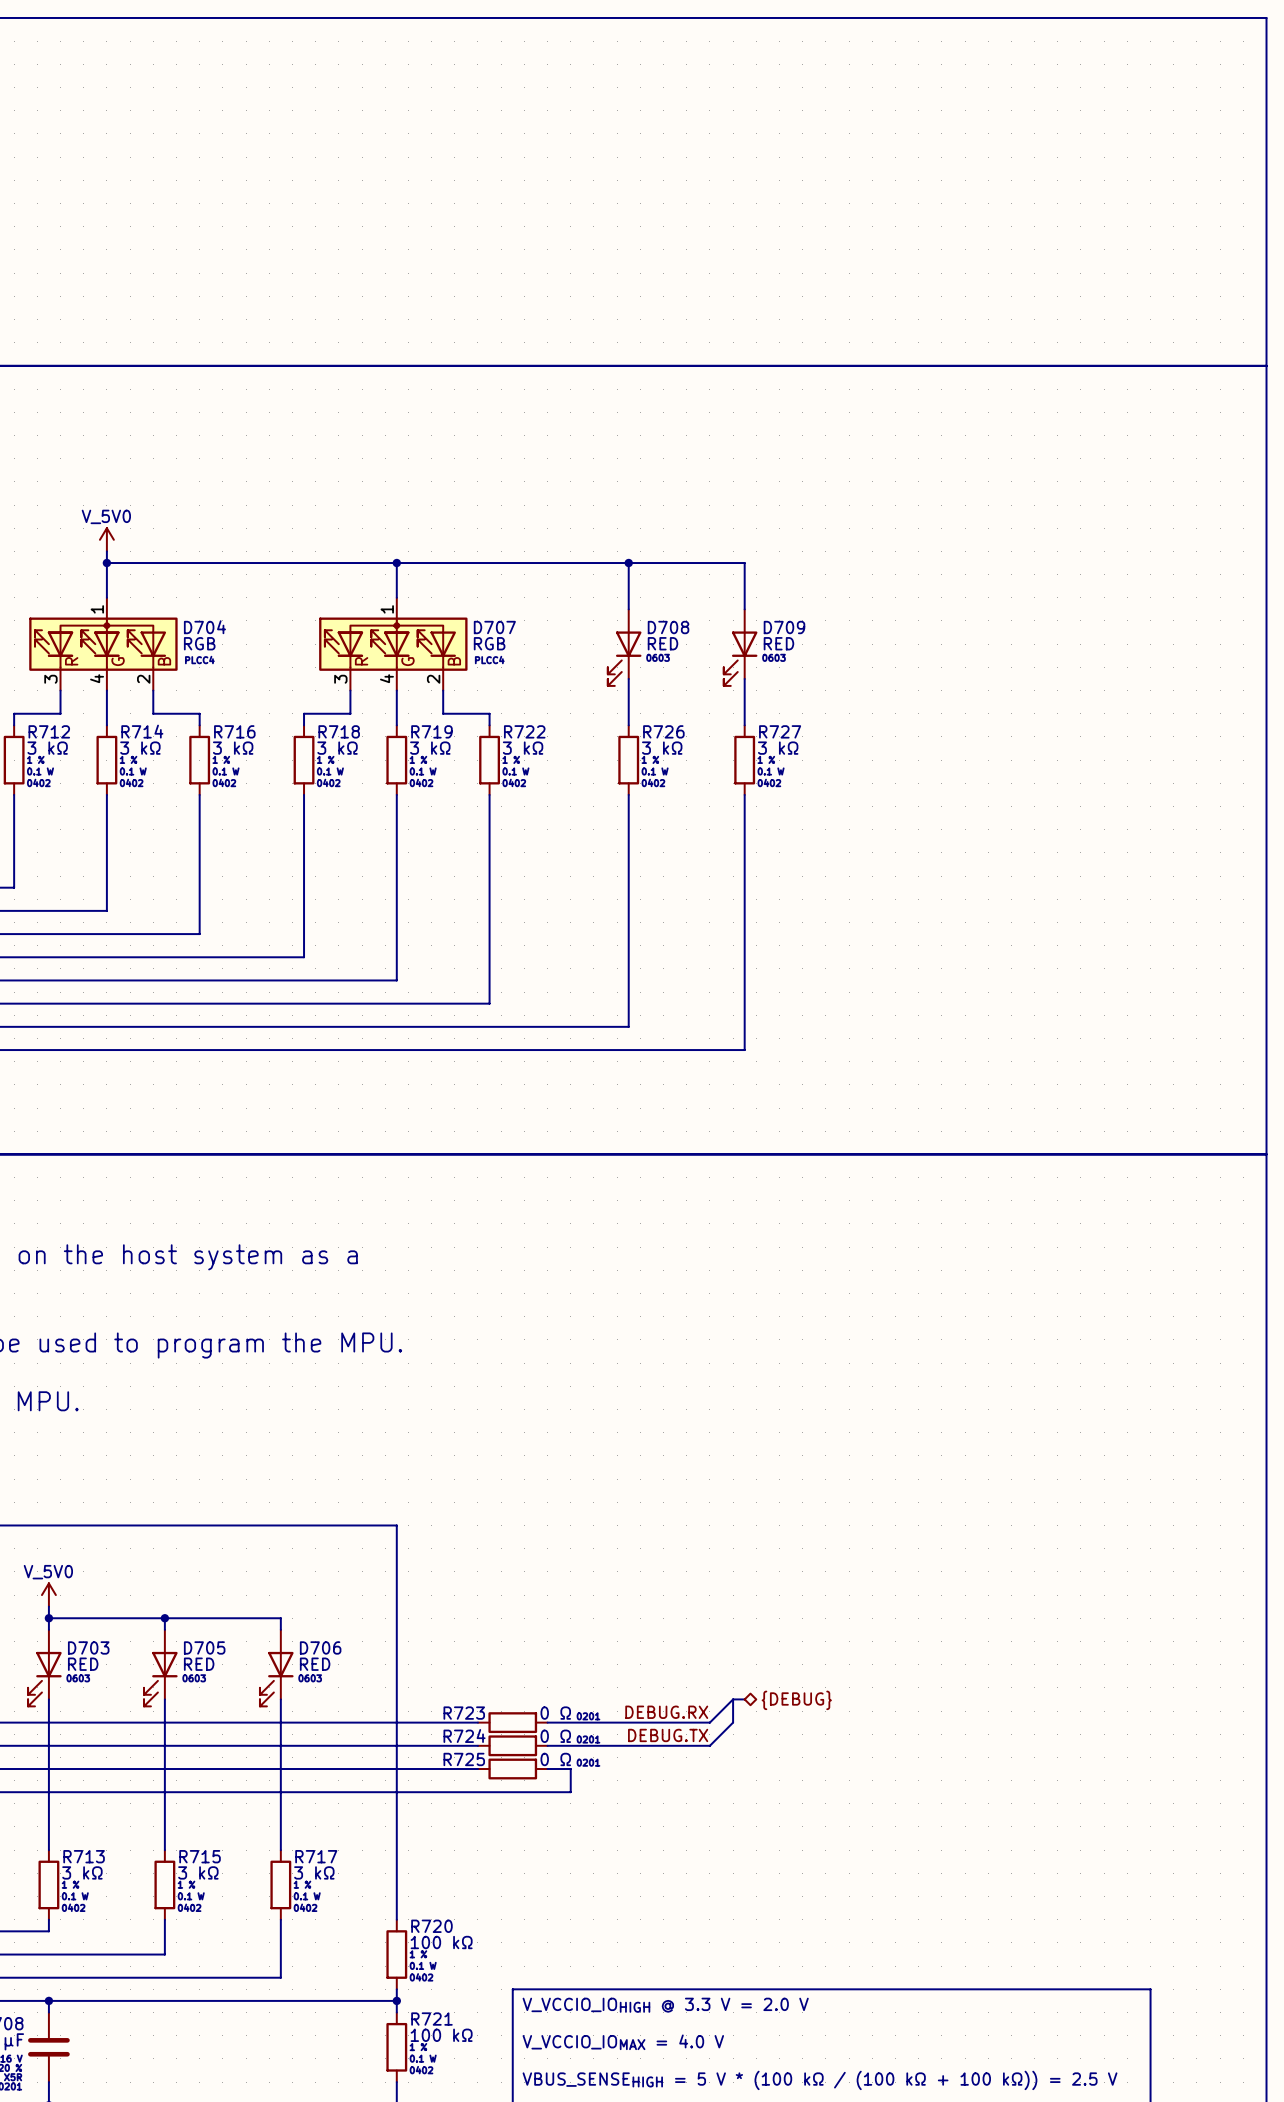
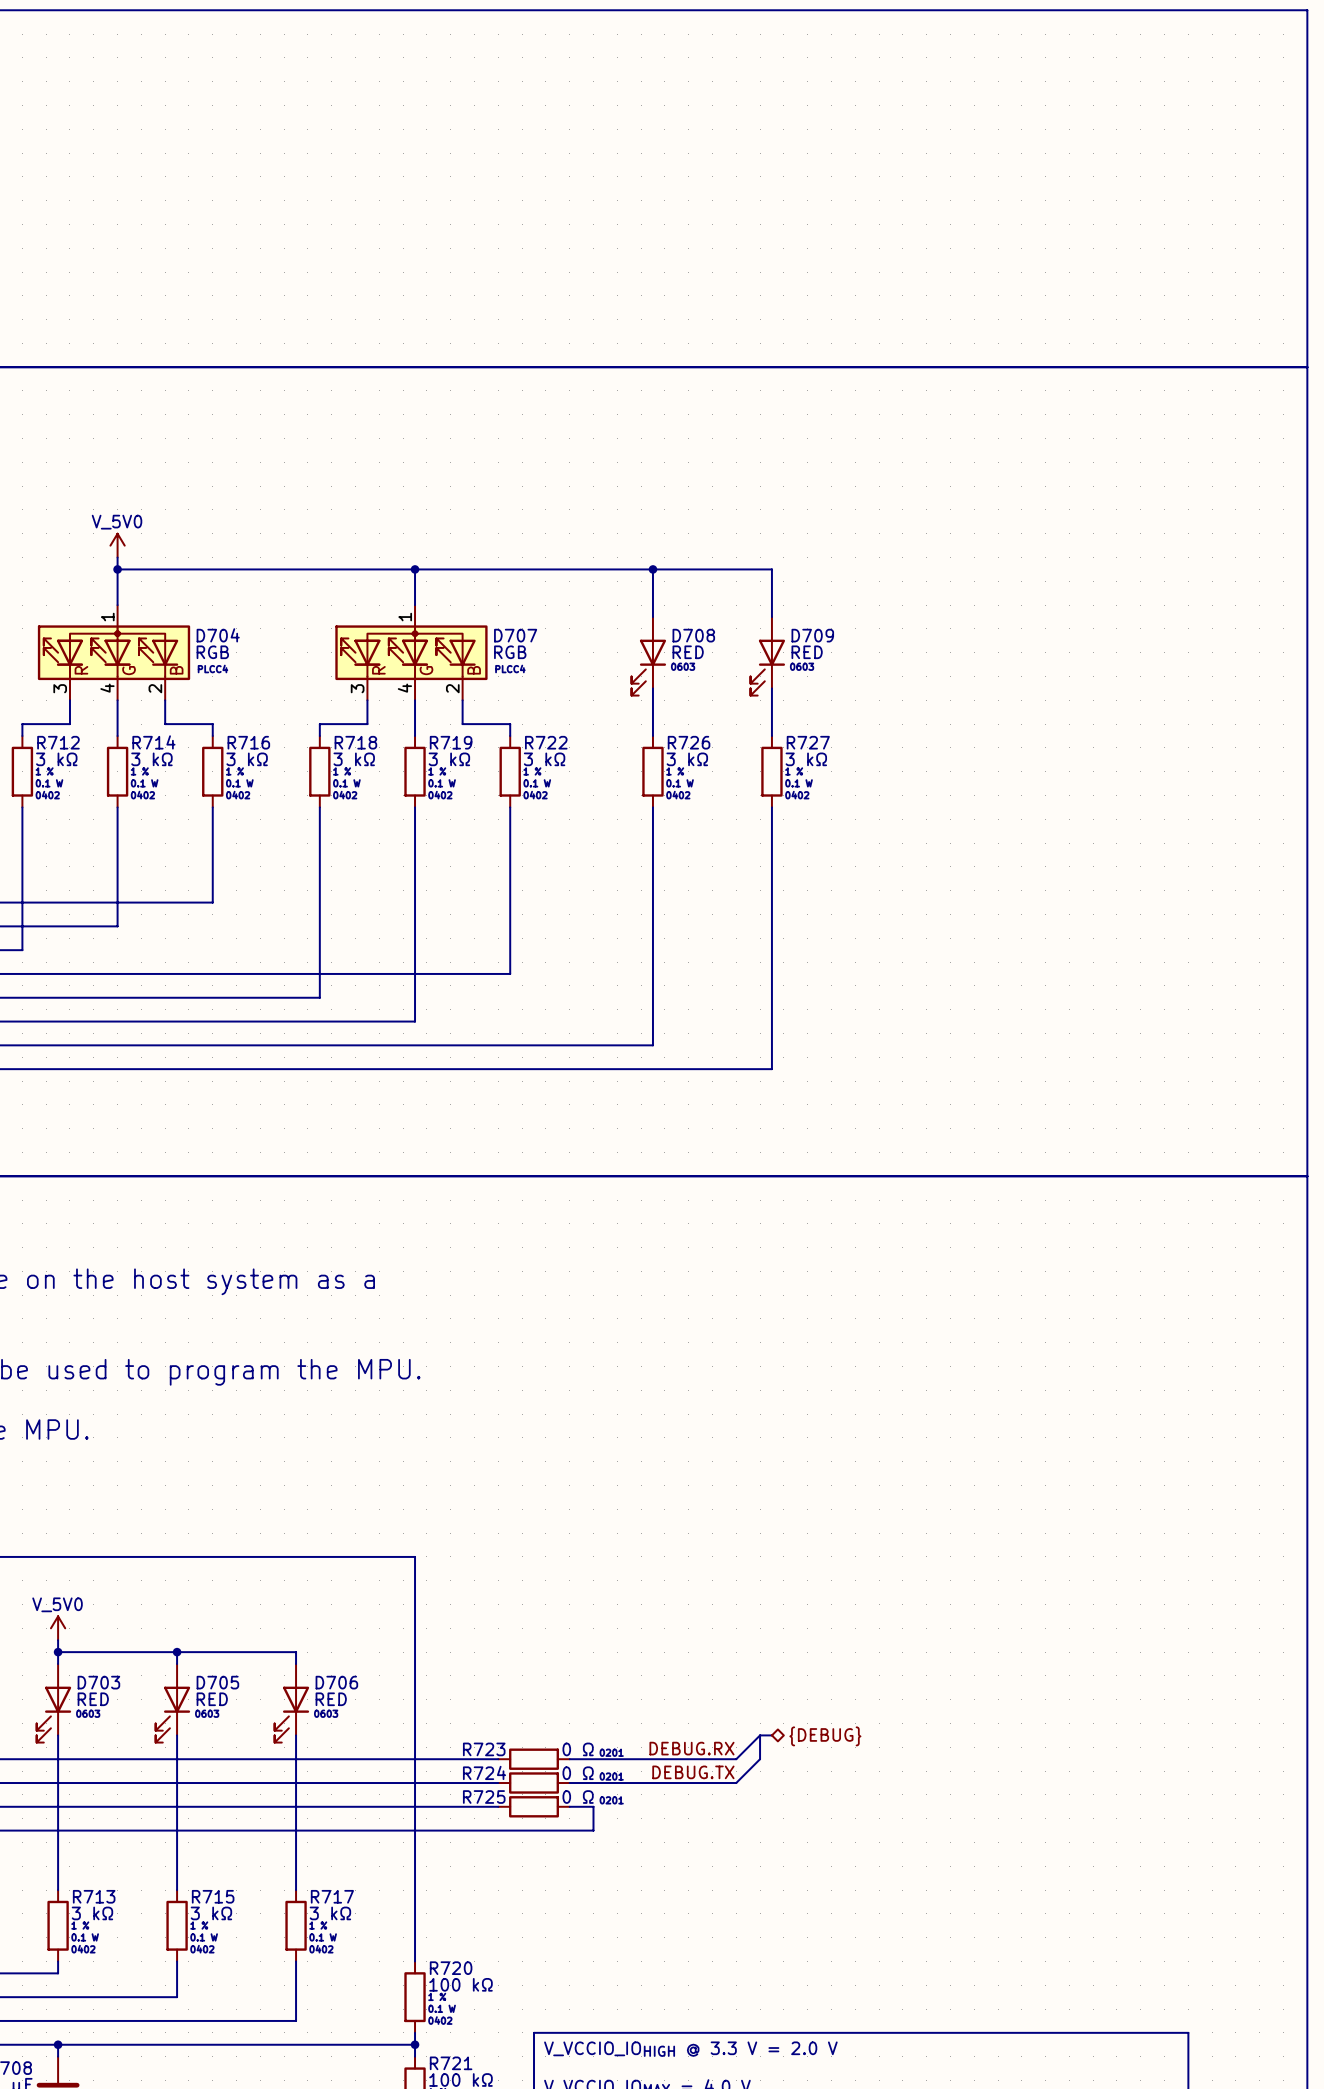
wire: (199, 887) (199, 934) (14, 934) -> (212, 902) (22, 902) (22, 950)
wire: (489, 957) (489, 1003) (396, 1003) -> (510, 973) (319, 973) (319, 997)
wire: (304, 980) (396, 980) -> (415, 1021) (415, 997)

